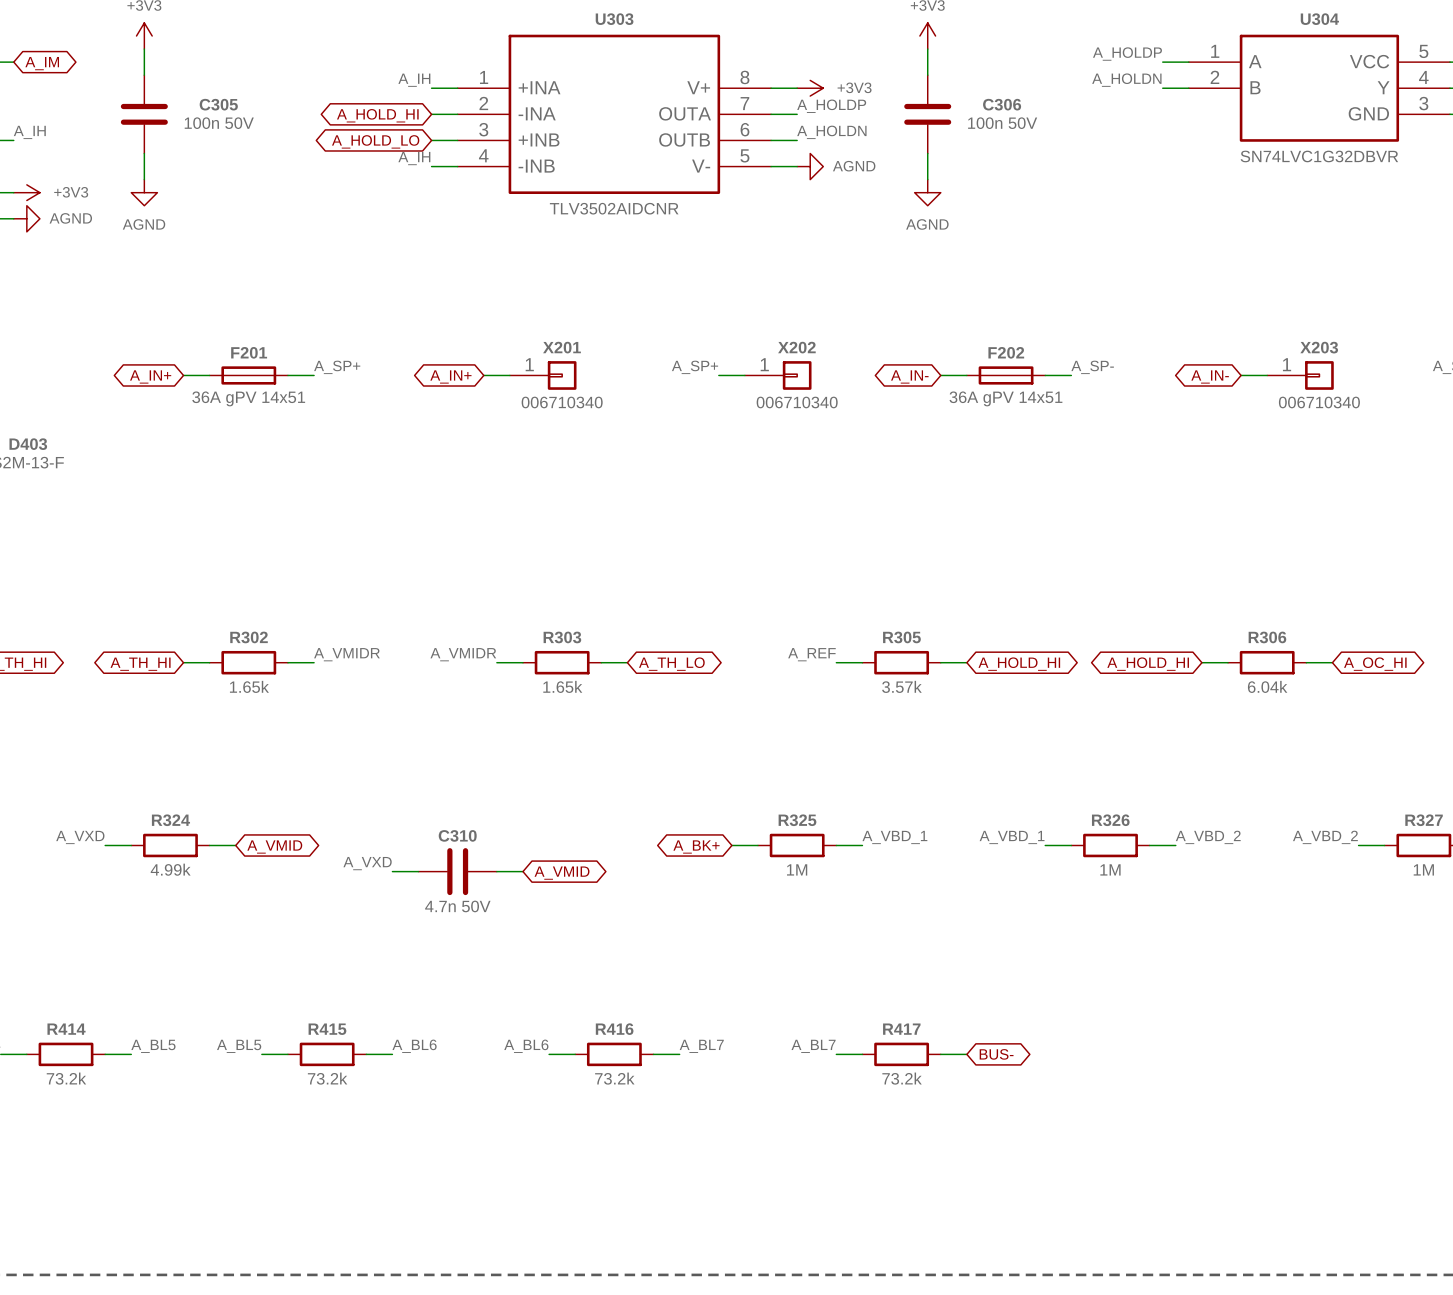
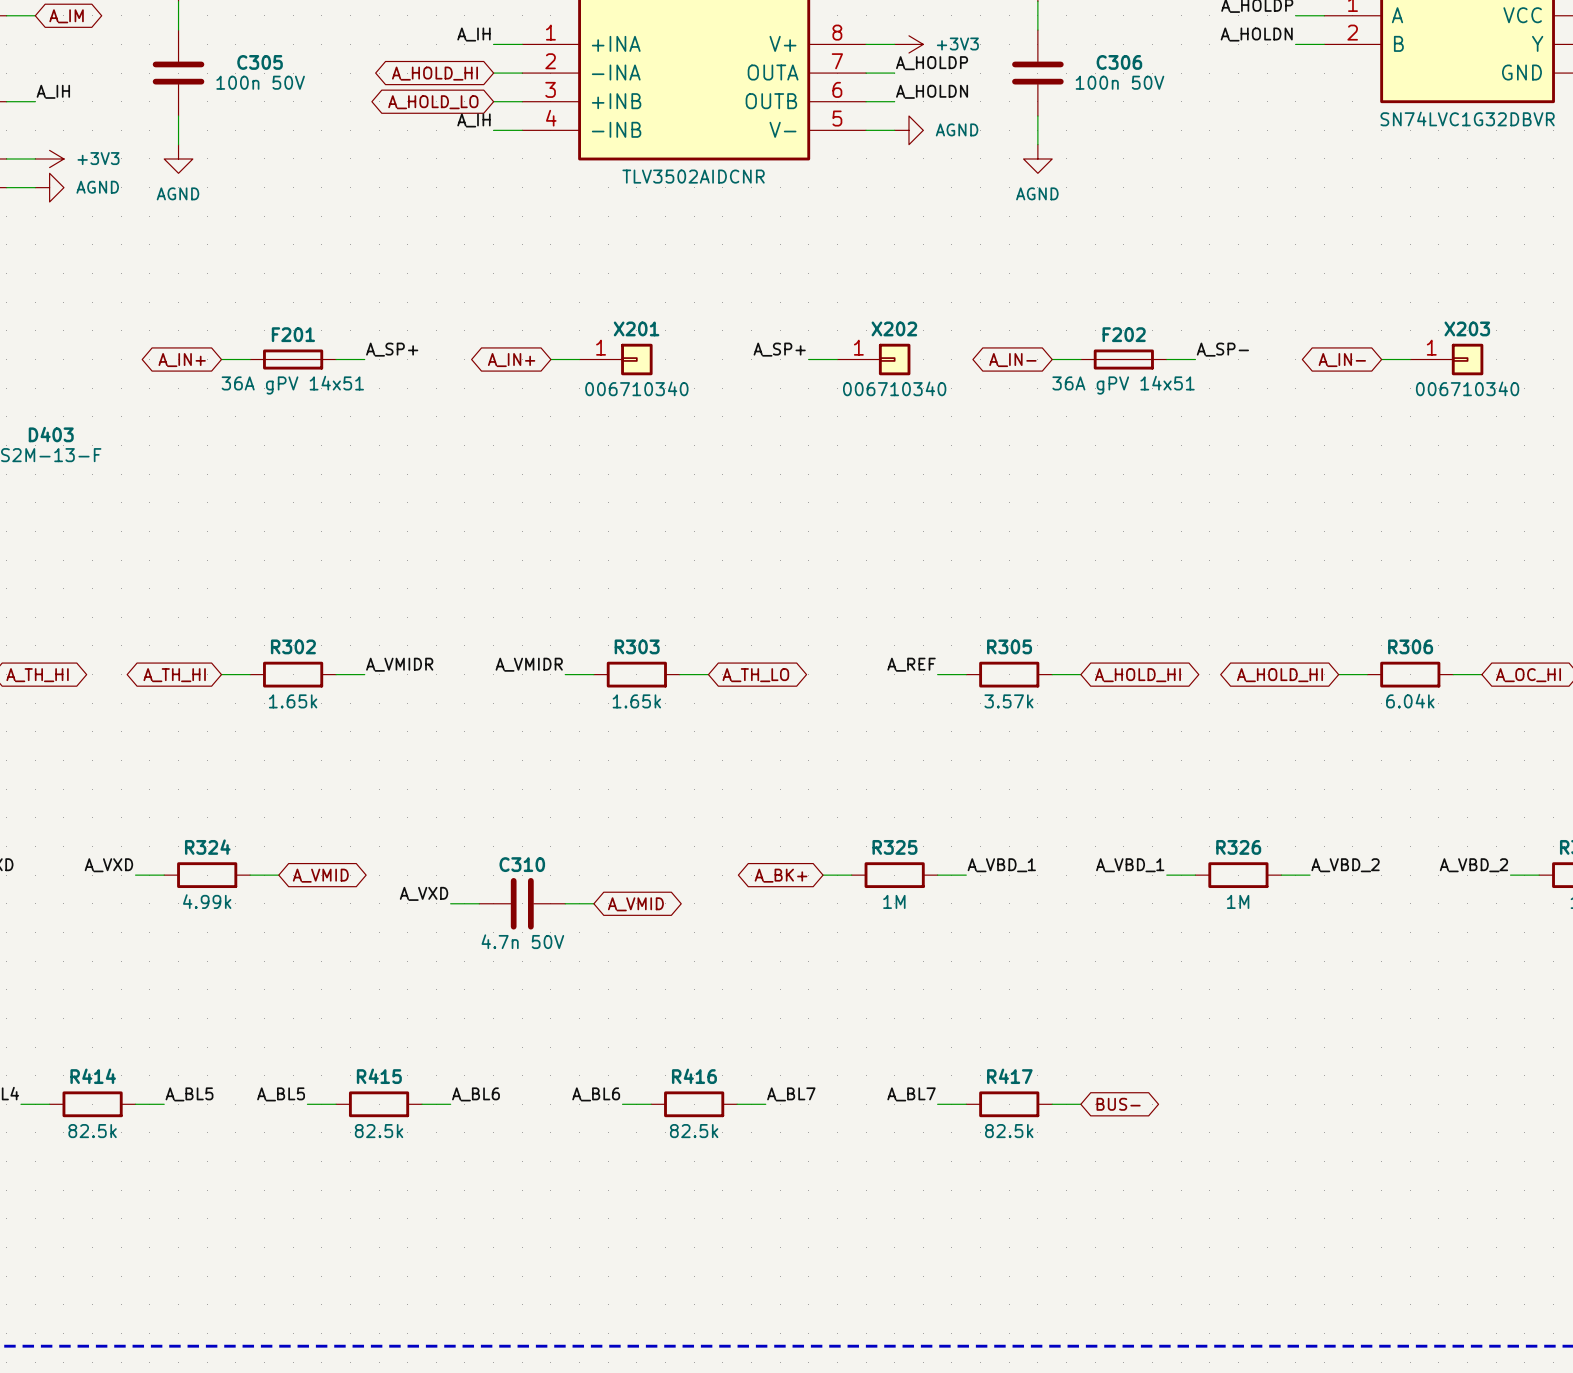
R414 value: 73.2k (66, 1078) -> 82.5k (92, 1131)
R415 value: 73.2k (327, 1078) -> 82.5k (379, 1131)
R416 value: 73.2k (614, 1078) -> 82.5k (694, 1131)
R417 value: 73.2k (902, 1078) -> 82.5k (1009, 1131)

